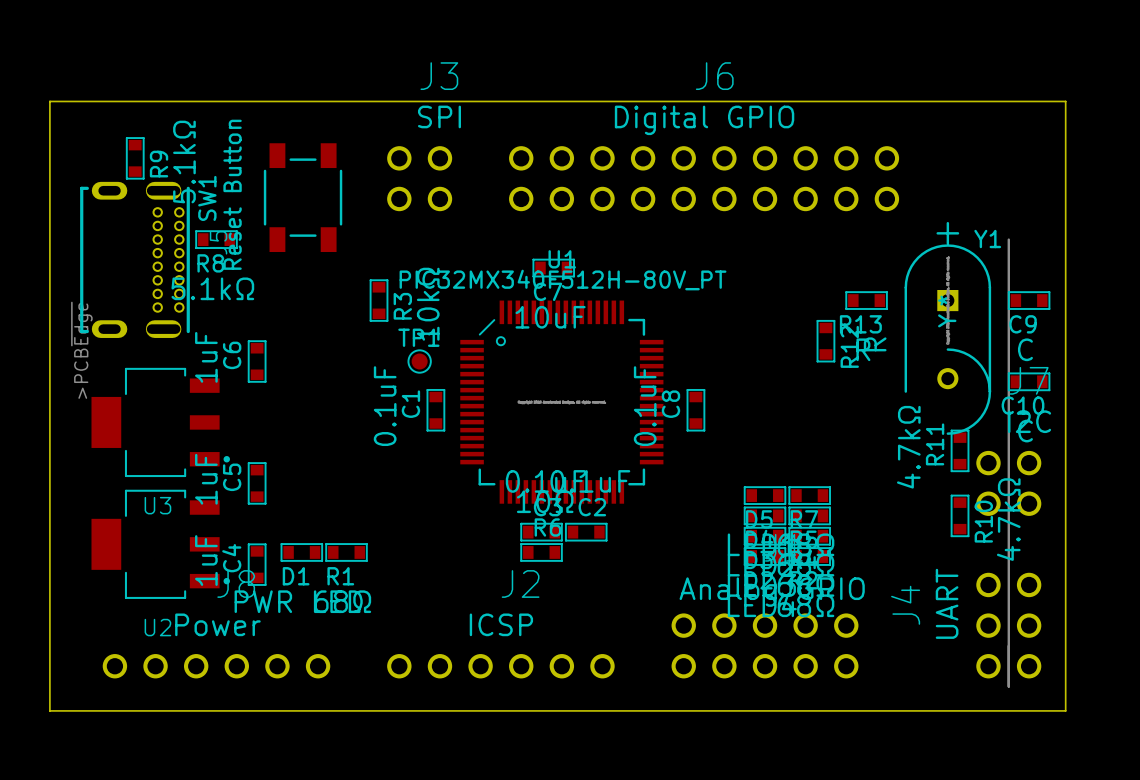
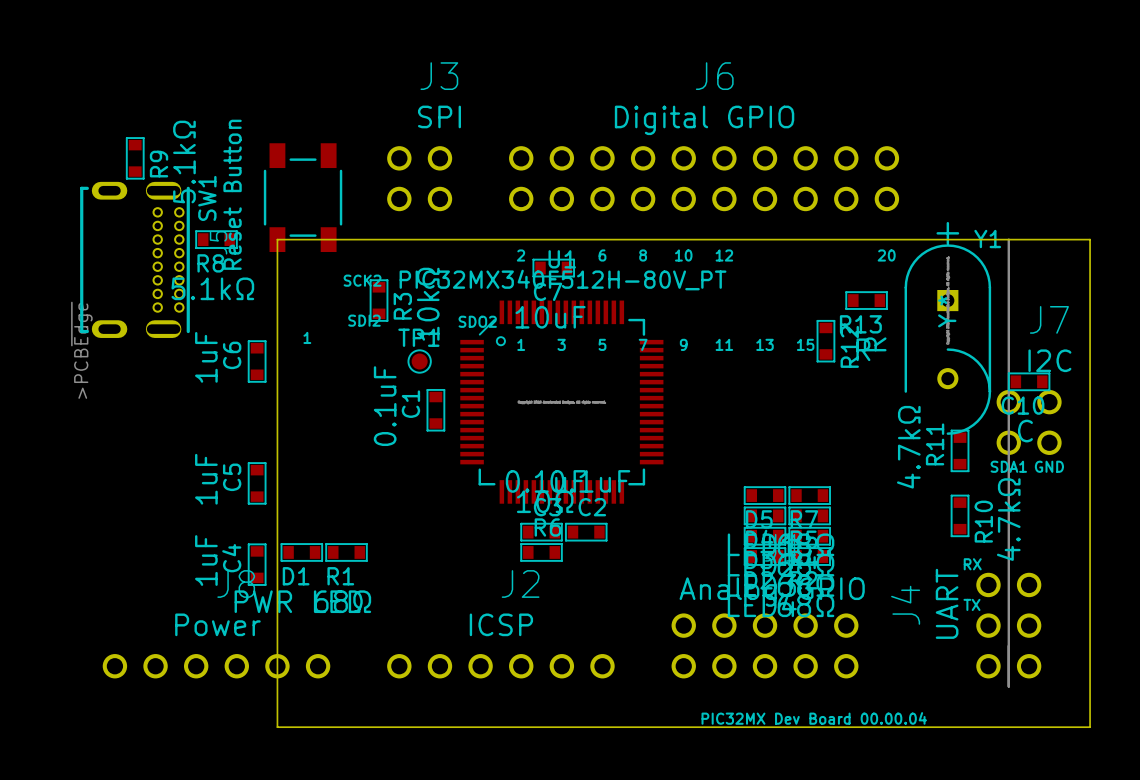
board edge: (49, 101) (1065, 101) (1065, 710) (49, 710) (49, 101) -> (277, 239) (277, 727) (1090, 727) (1090, 239) (277, 239)
text: none -> 2 (520, 255)
text: none -> 6 (602, 255)
text: none -> 8 (643, 255)
text: none -> 10 (683, 255)
text: none -> 12 (724, 255)
text: none -> 20 (886, 255)
text: none -> SCK2 (362, 280)
C9: C (1029, 300) -> none
text: none -> SDI2 (364, 320)
text: none -> SDO2 (477, 321)
text: none -> 1 (307, 337)
text: none -> 1 (521, 344)
text: none -> 3 (561, 344)
text: none -> 5 (602, 344)
text: none -> 7 (643, 344)
text: none -> 9 (683, 344)
text: none -> 11 (724, 344)
text: none -> 13 (765, 344)
text: none -> 15 (805, 344)
C8: 0.1uF (695, 410) -> none
U3: (160, 422) -> none
text: none -> SDA1 (1008, 466)
text: none -> GND (1049, 466)
J7 position: (1008, 483) -> (1029, 422)
U2: (160, 544) -> none
text: none -> RX (972, 564)
text: none -> TX (971, 604)
text: none -> PIC32MX Dev Board 00.00.04 (814, 718)

